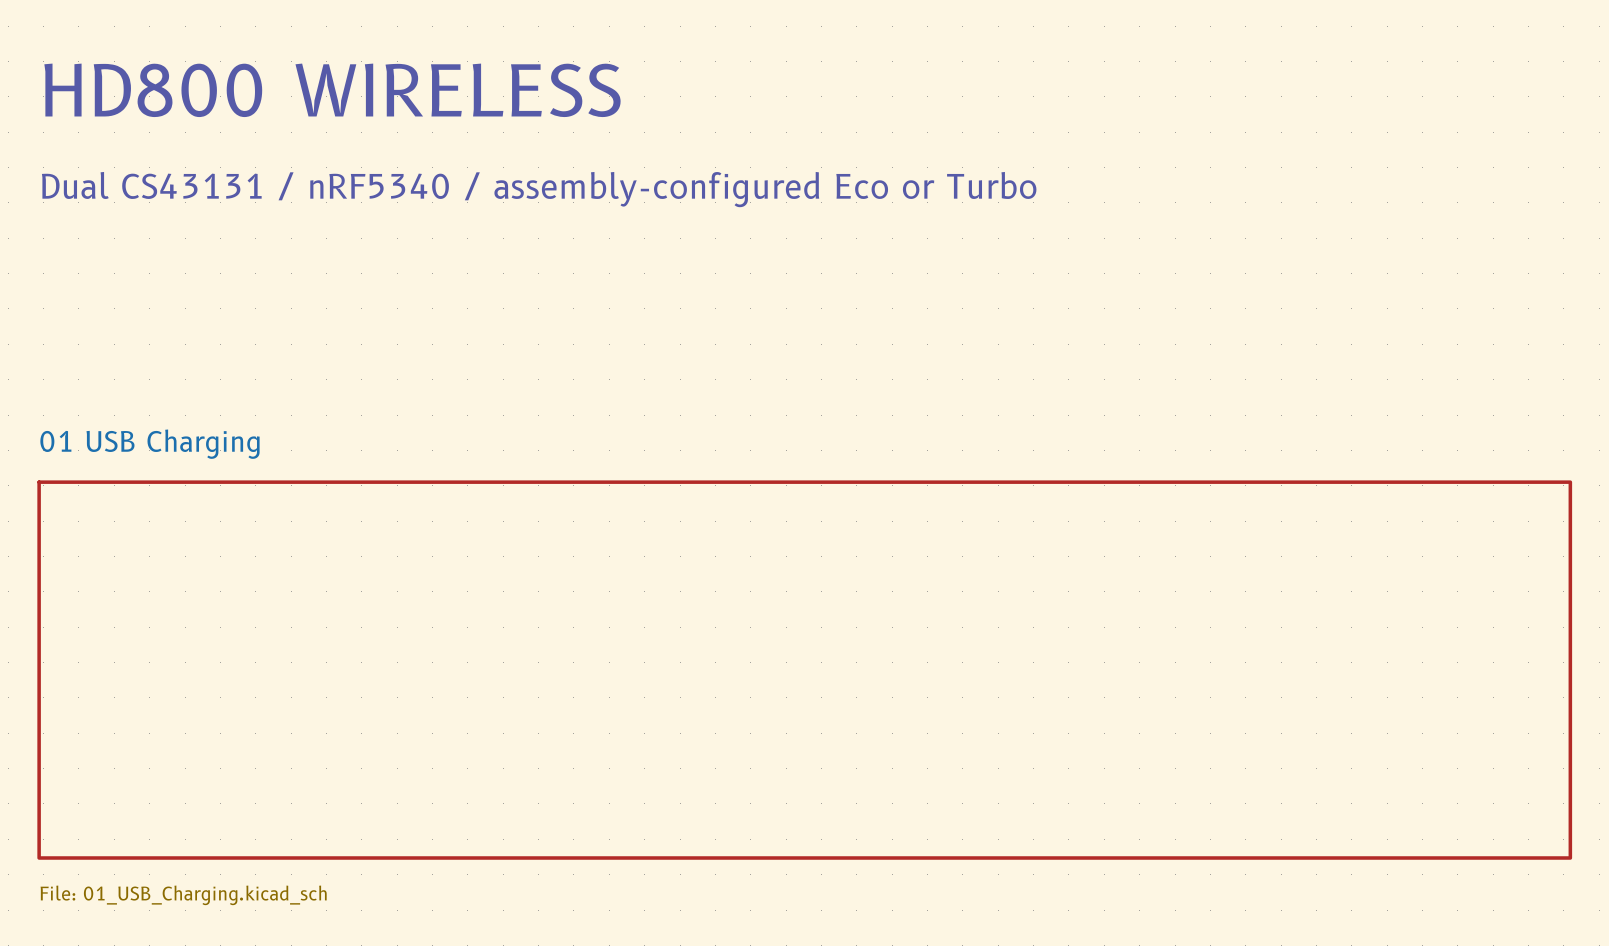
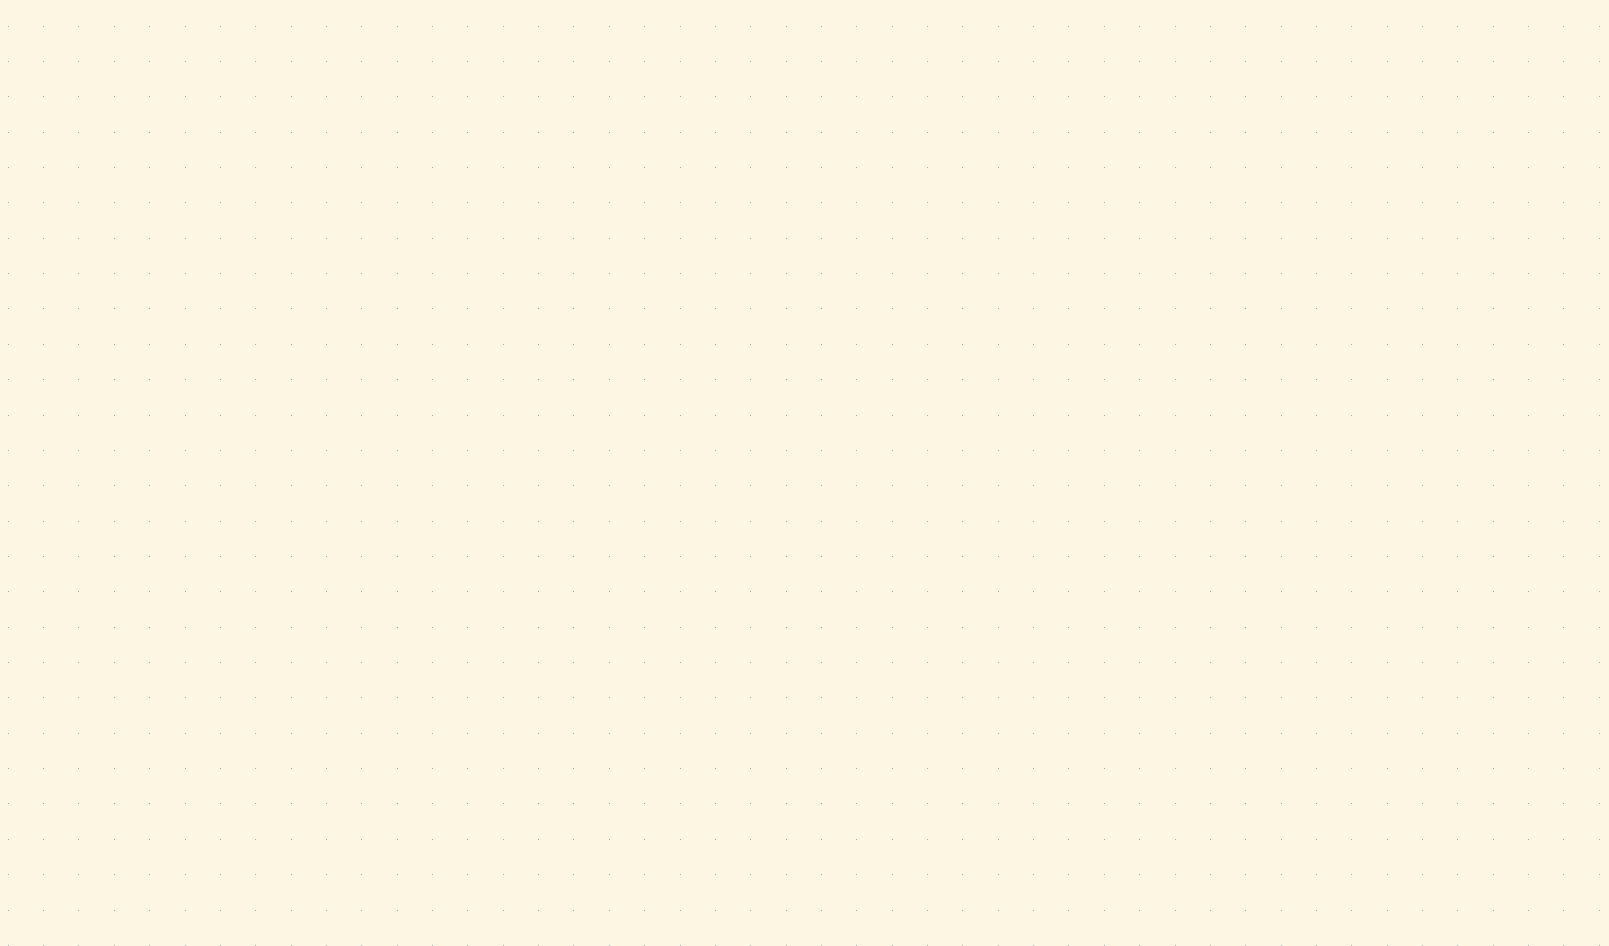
text: HD800 WIRELESS (332, 90) -> none
text: Dual CS43131 / nRF5340 / assembly-configured Eco or Turbo (539, 189) -> none
sheet 01 USB Charging: File: 01_USB_Charging.kicad_sch (804, 670) -> none

